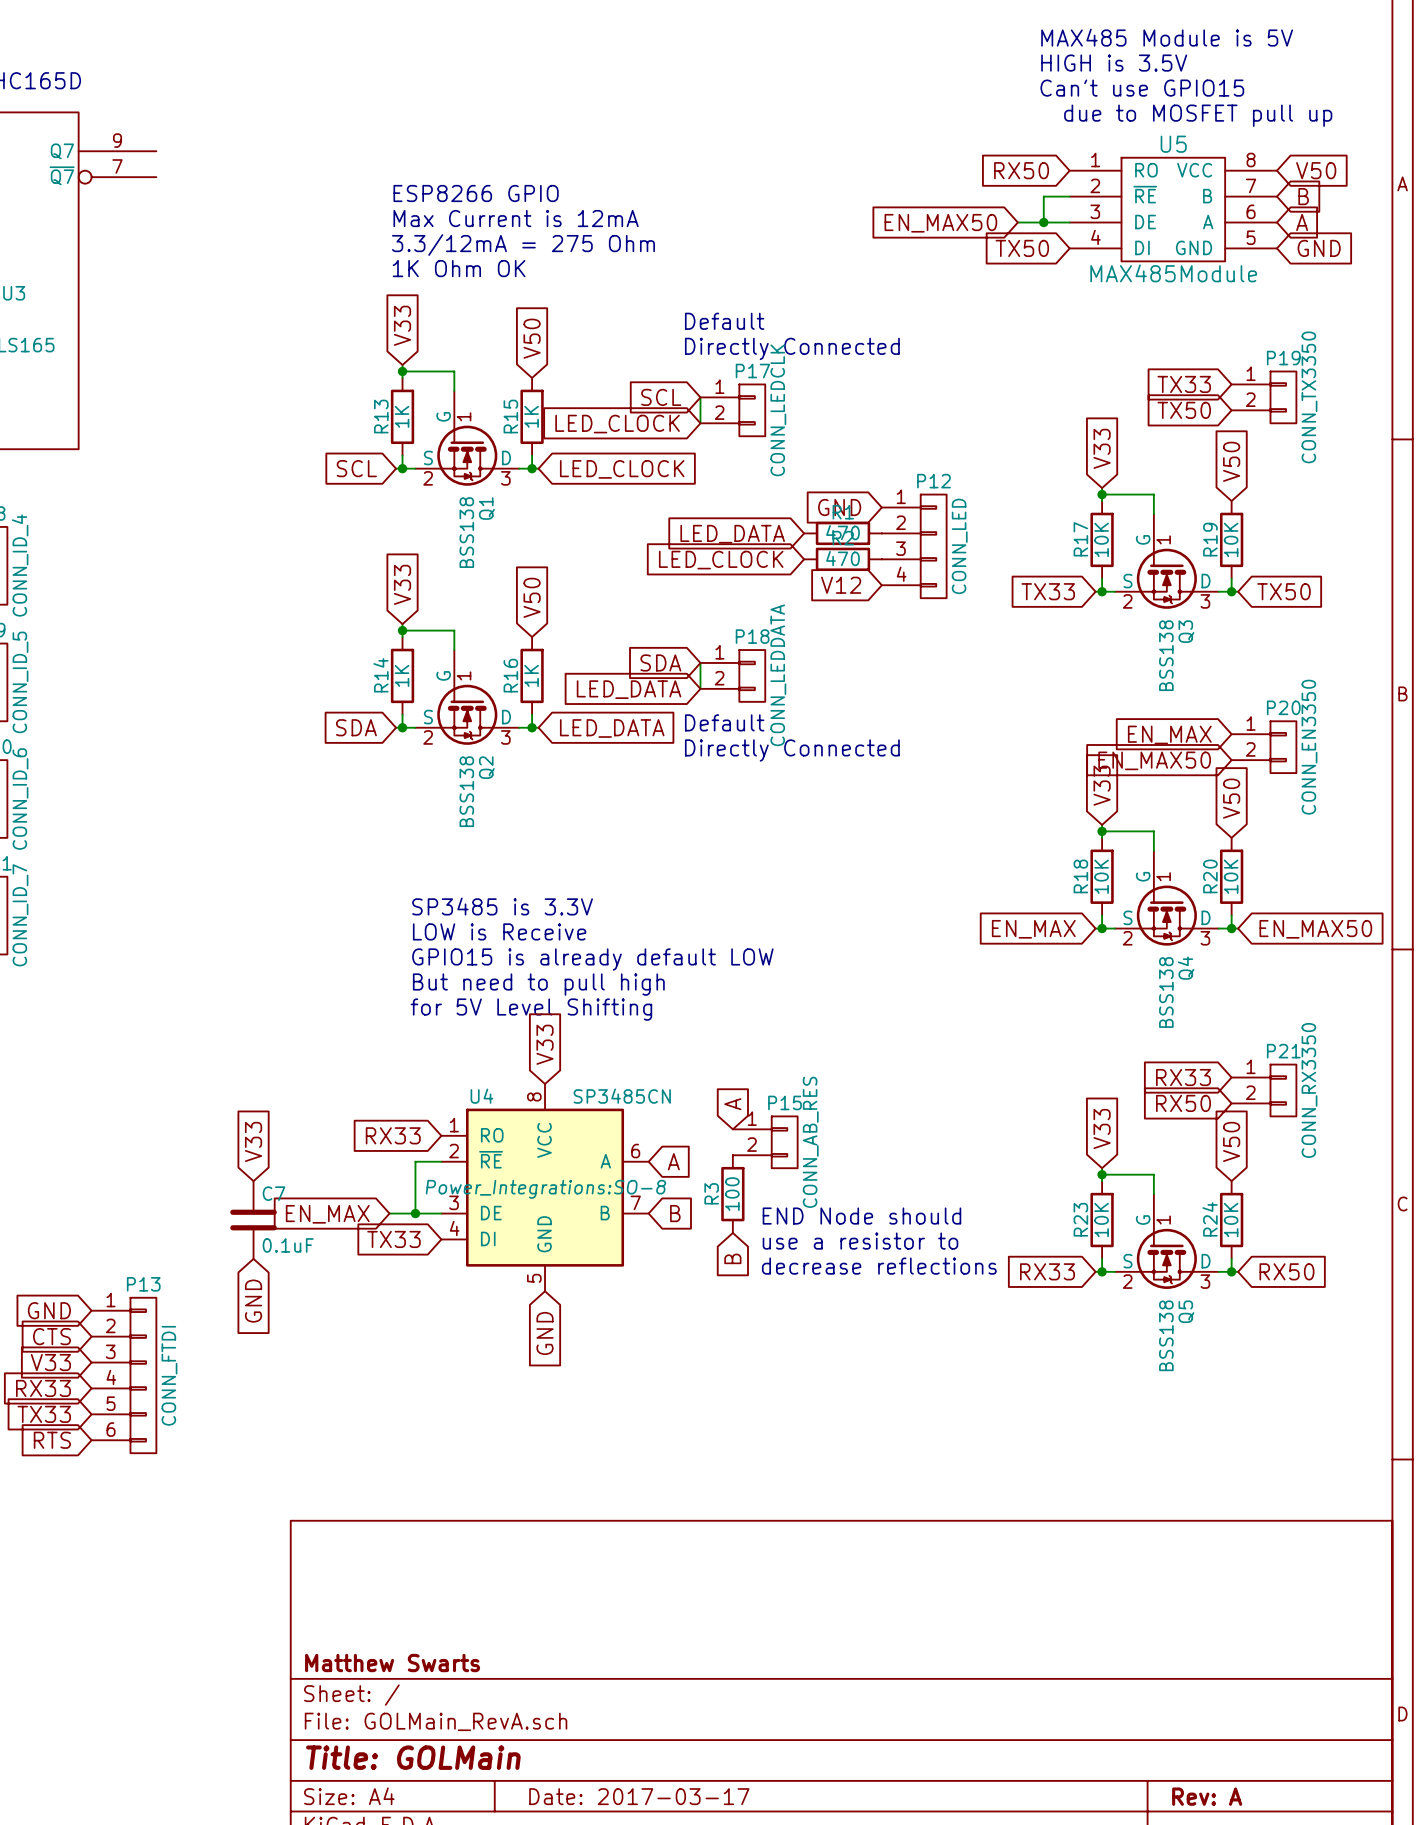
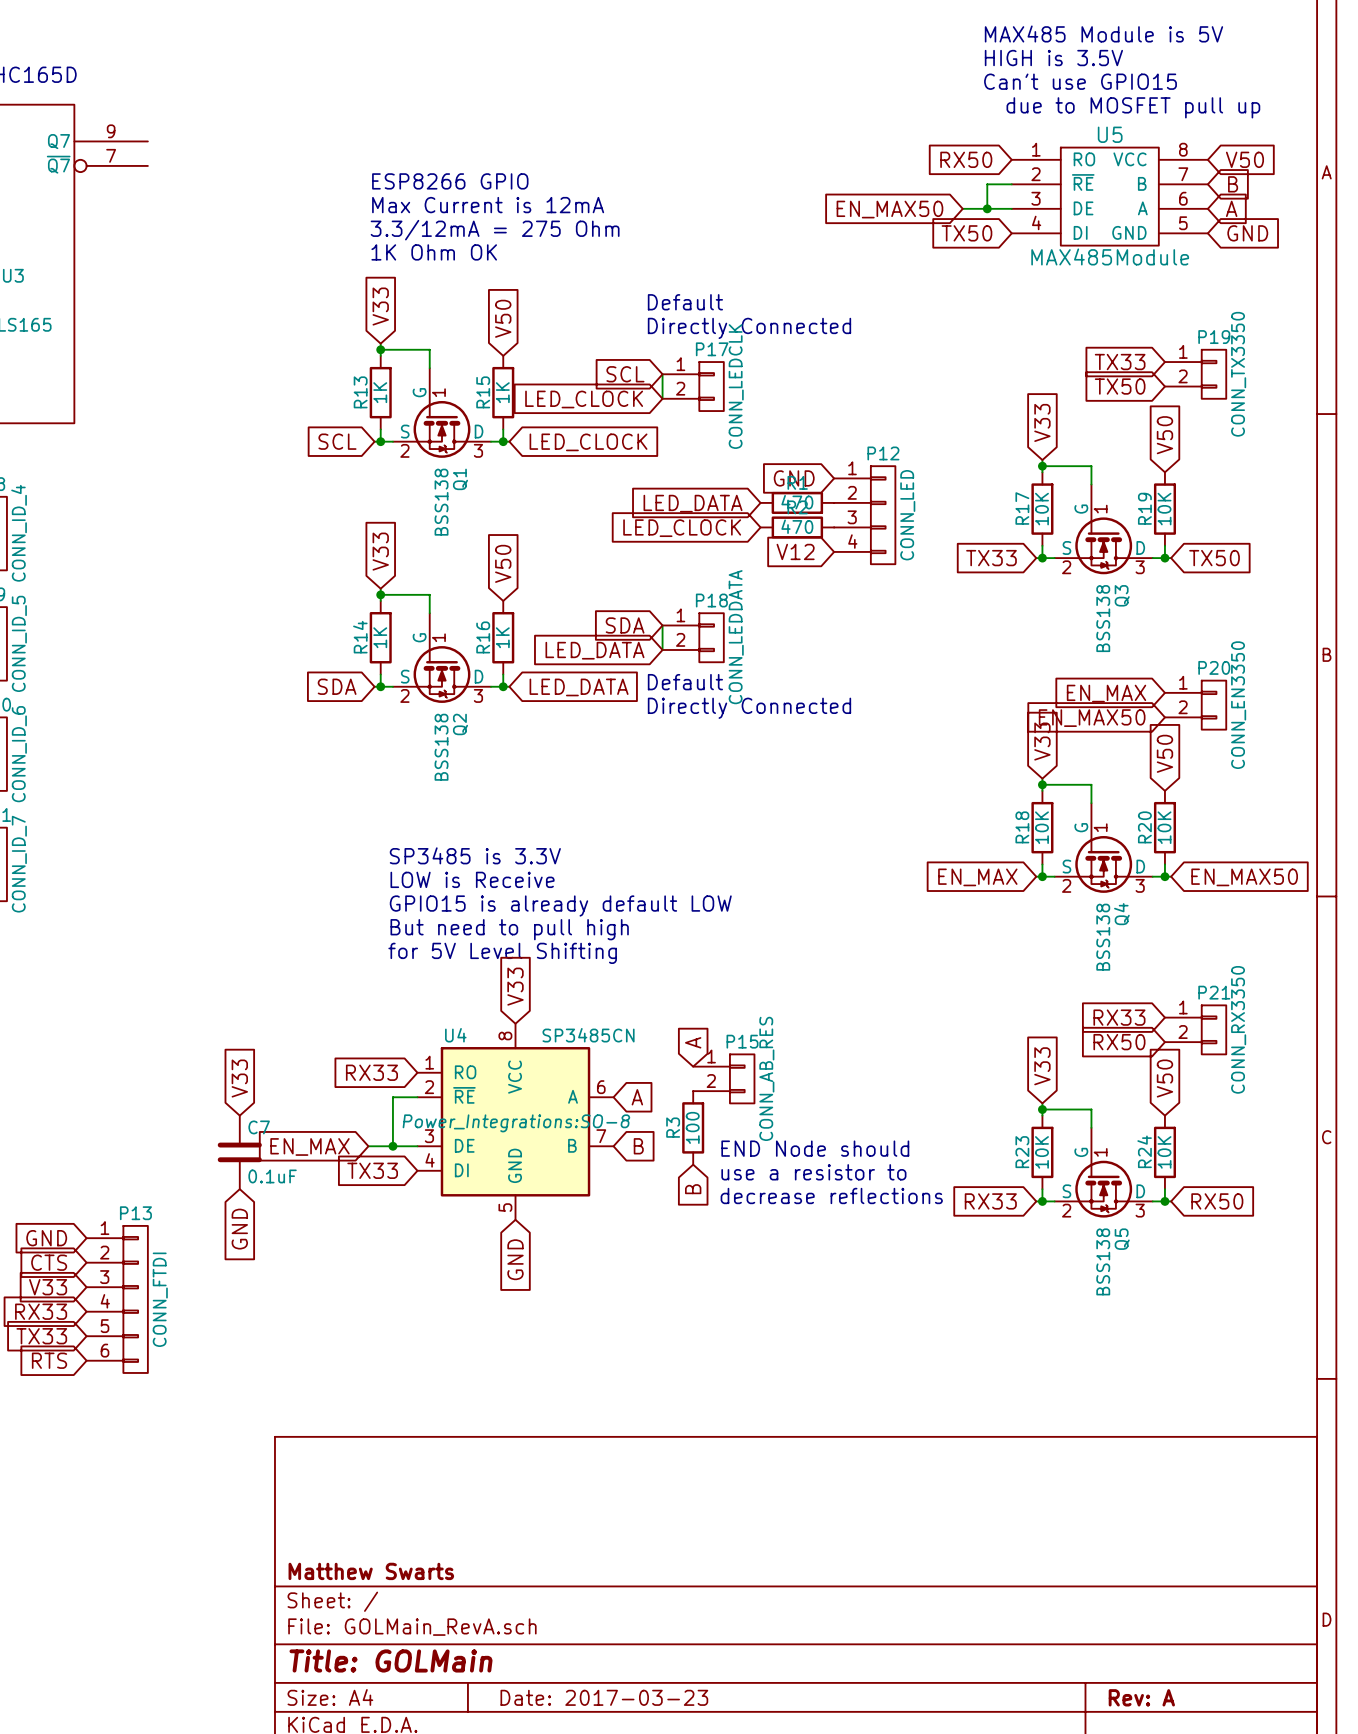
title block: Date: 2017-03-17 (639, 1796) -> Date: 2017-03-23 (604, 1697)

